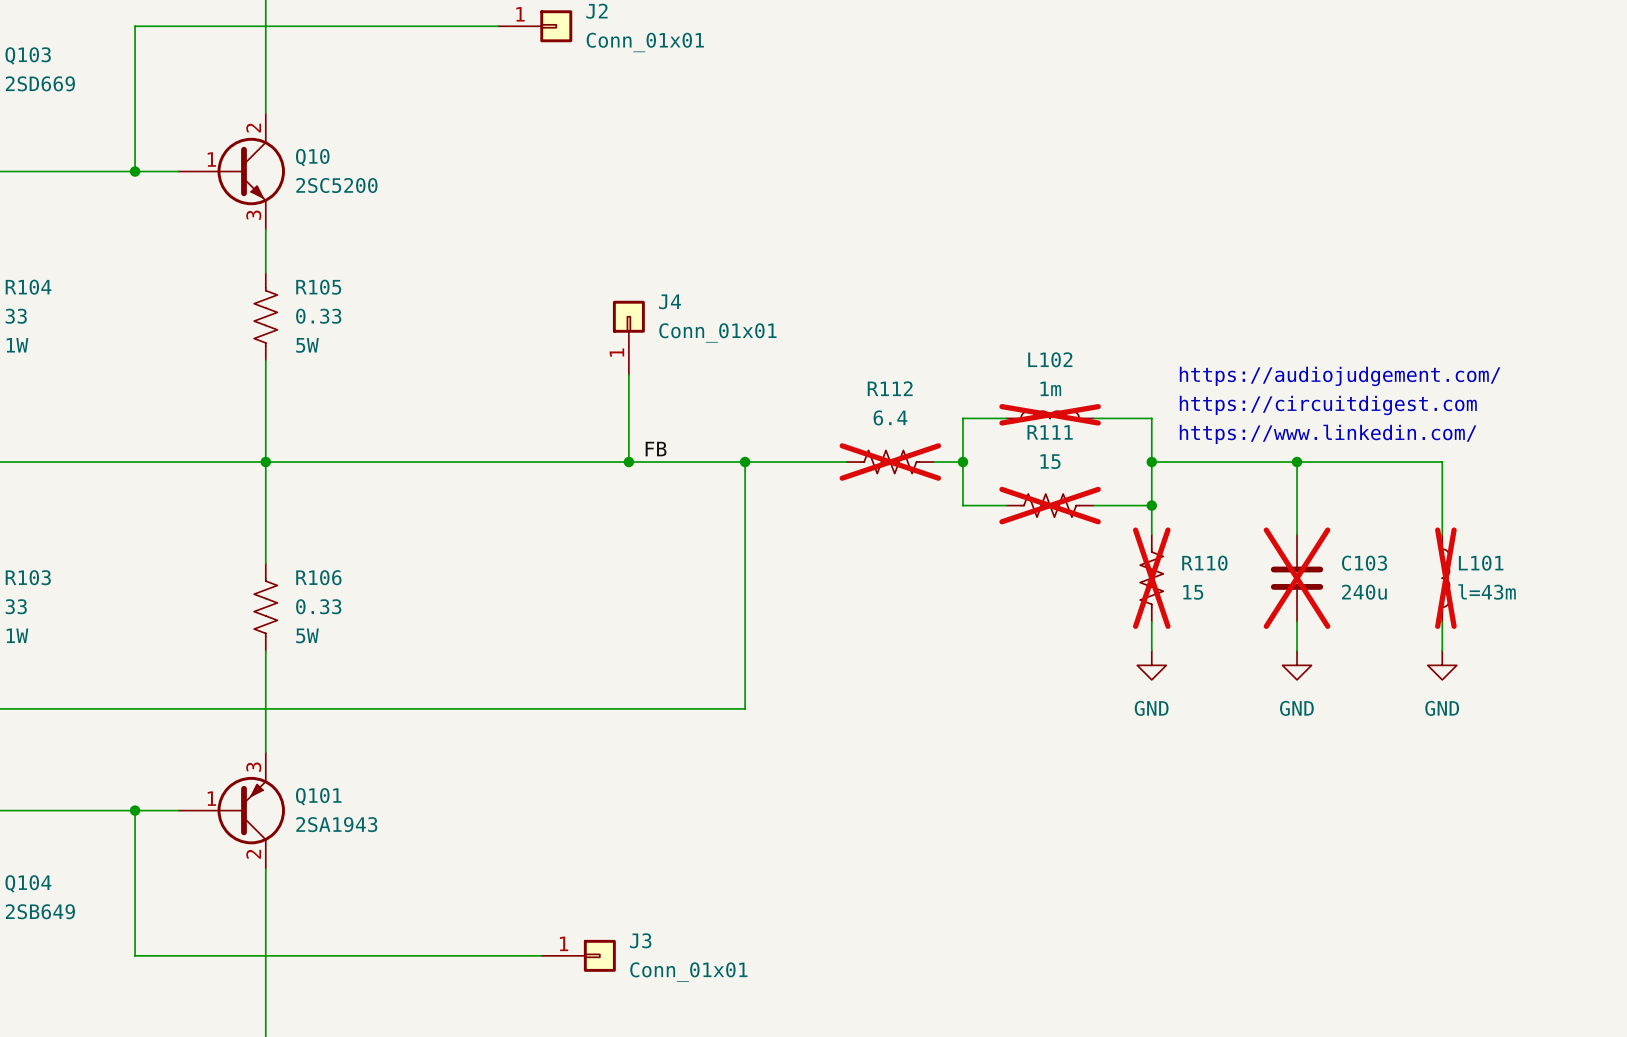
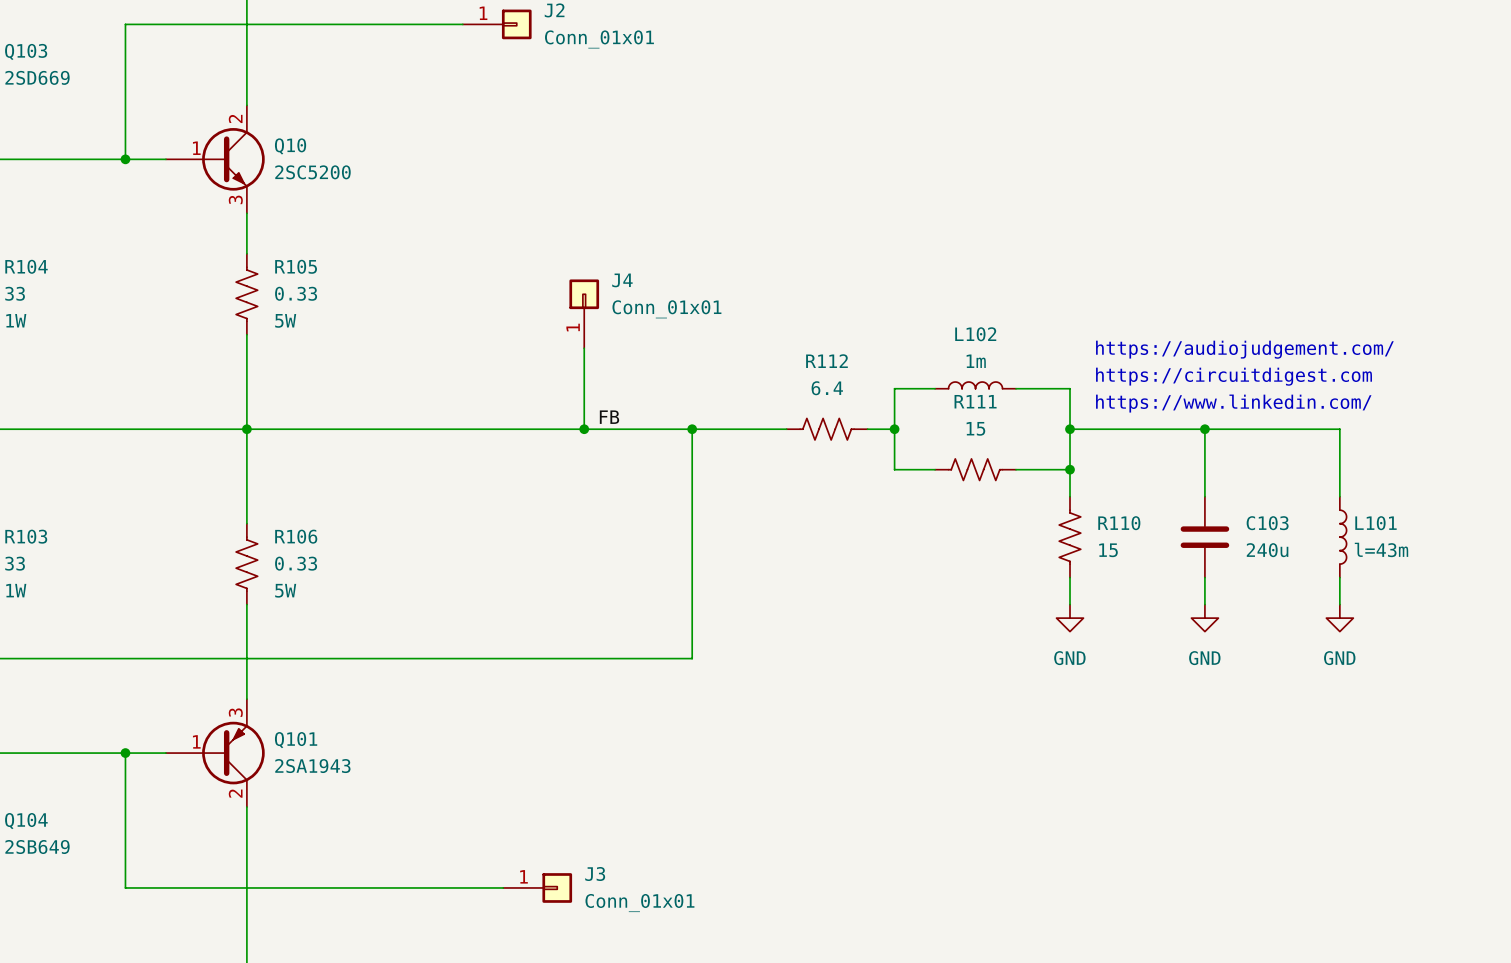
L102 do-not-place cross: (1050, 414) -> none
R112 do-not-place cross: (890, 462) -> none
R111 do-not-place cross: (1050, 505) -> none
R110 do-not-place cross: (1151, 578) -> none
C103 do-not-place cross: (1297, 578) -> none
L101 do-not-place cross: (1445, 578) -> none

